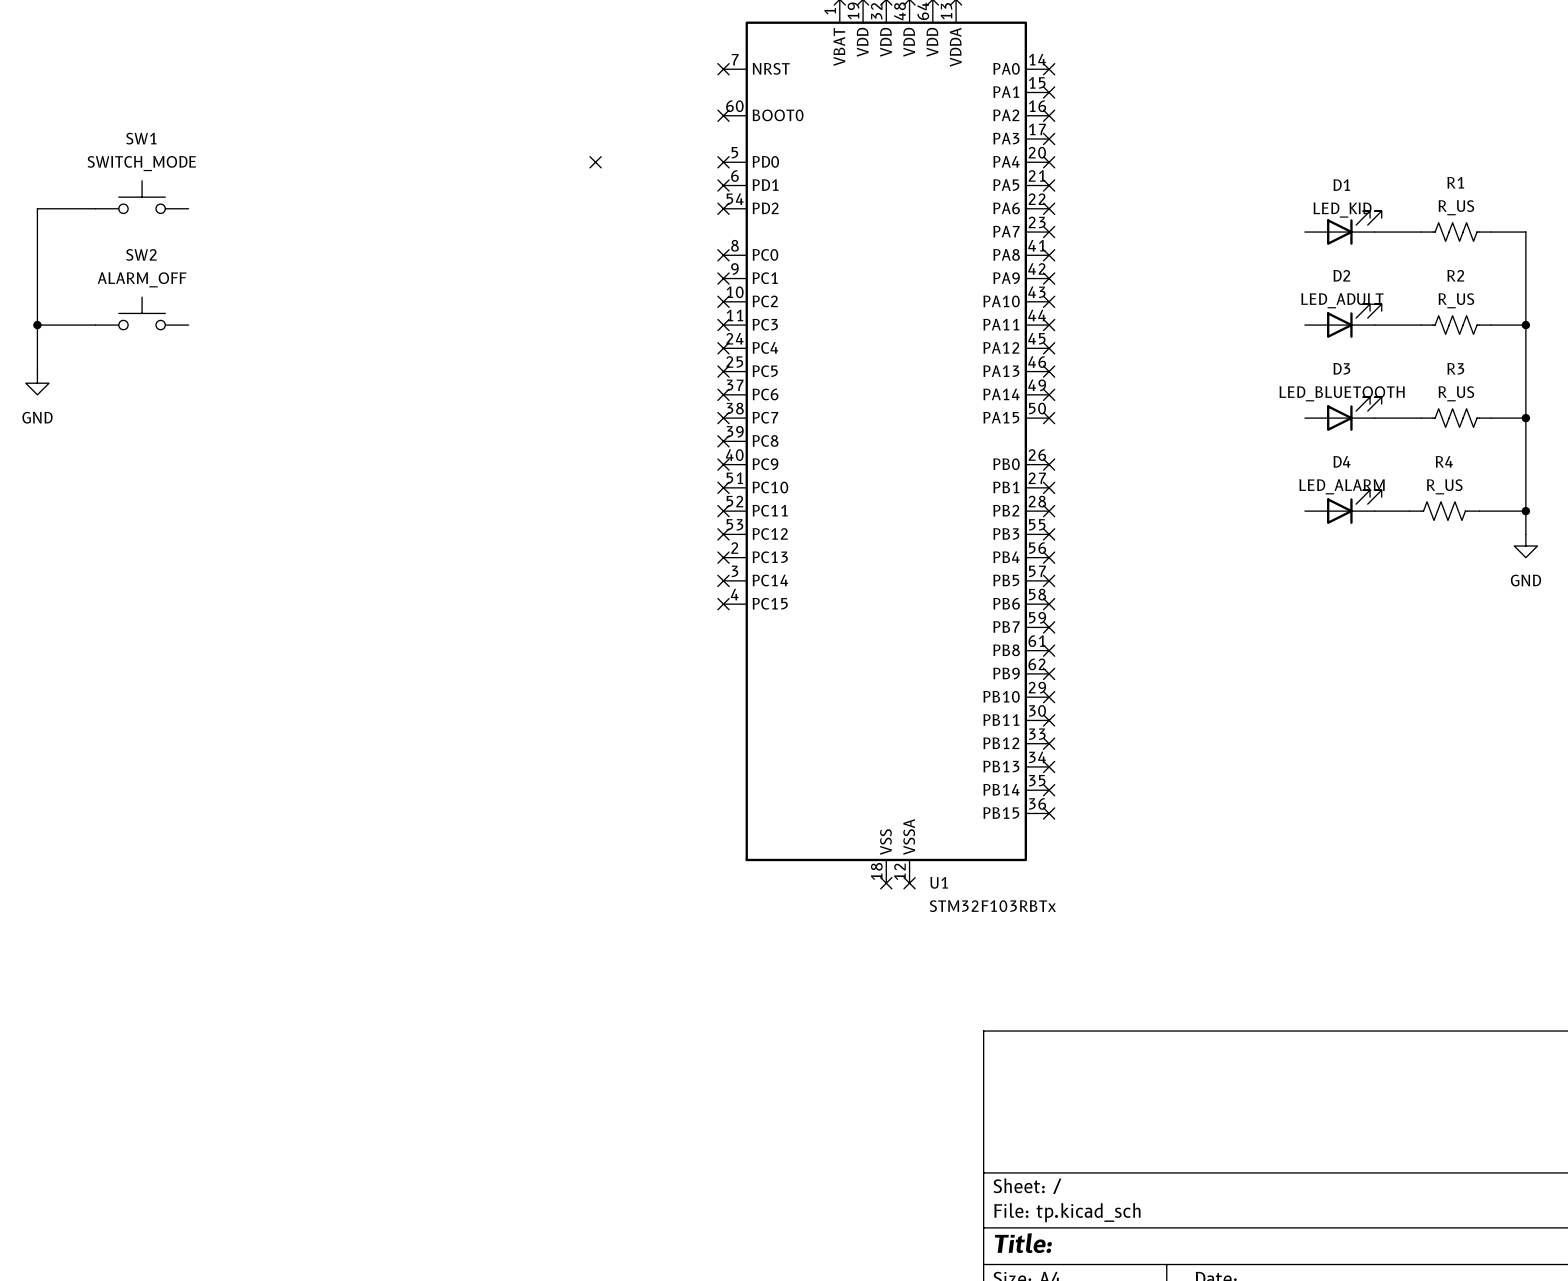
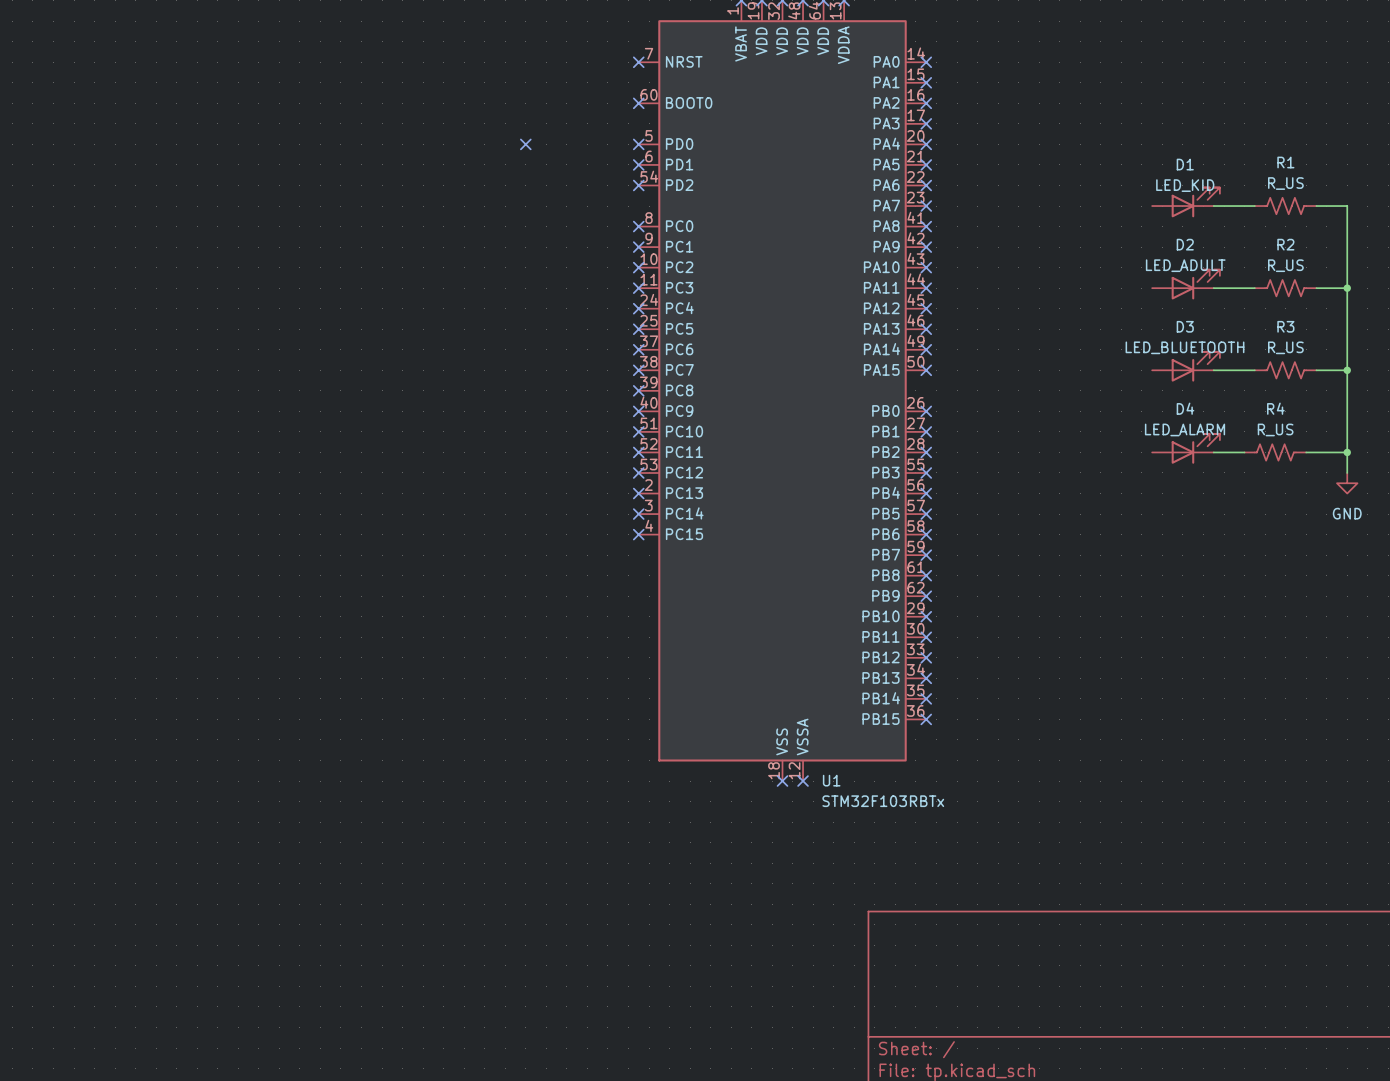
SW1: SWITCH_MODE (142, 197) -> none
wire: (95, 208) (37, 208) (37, 371) -> none
SW2: ALARM_OFF (142, 313) -> none
wire: (37, 325) (95, 325) -> none
junction: (37, 325) -> none
power symbol: GND (37, 383) -> none

